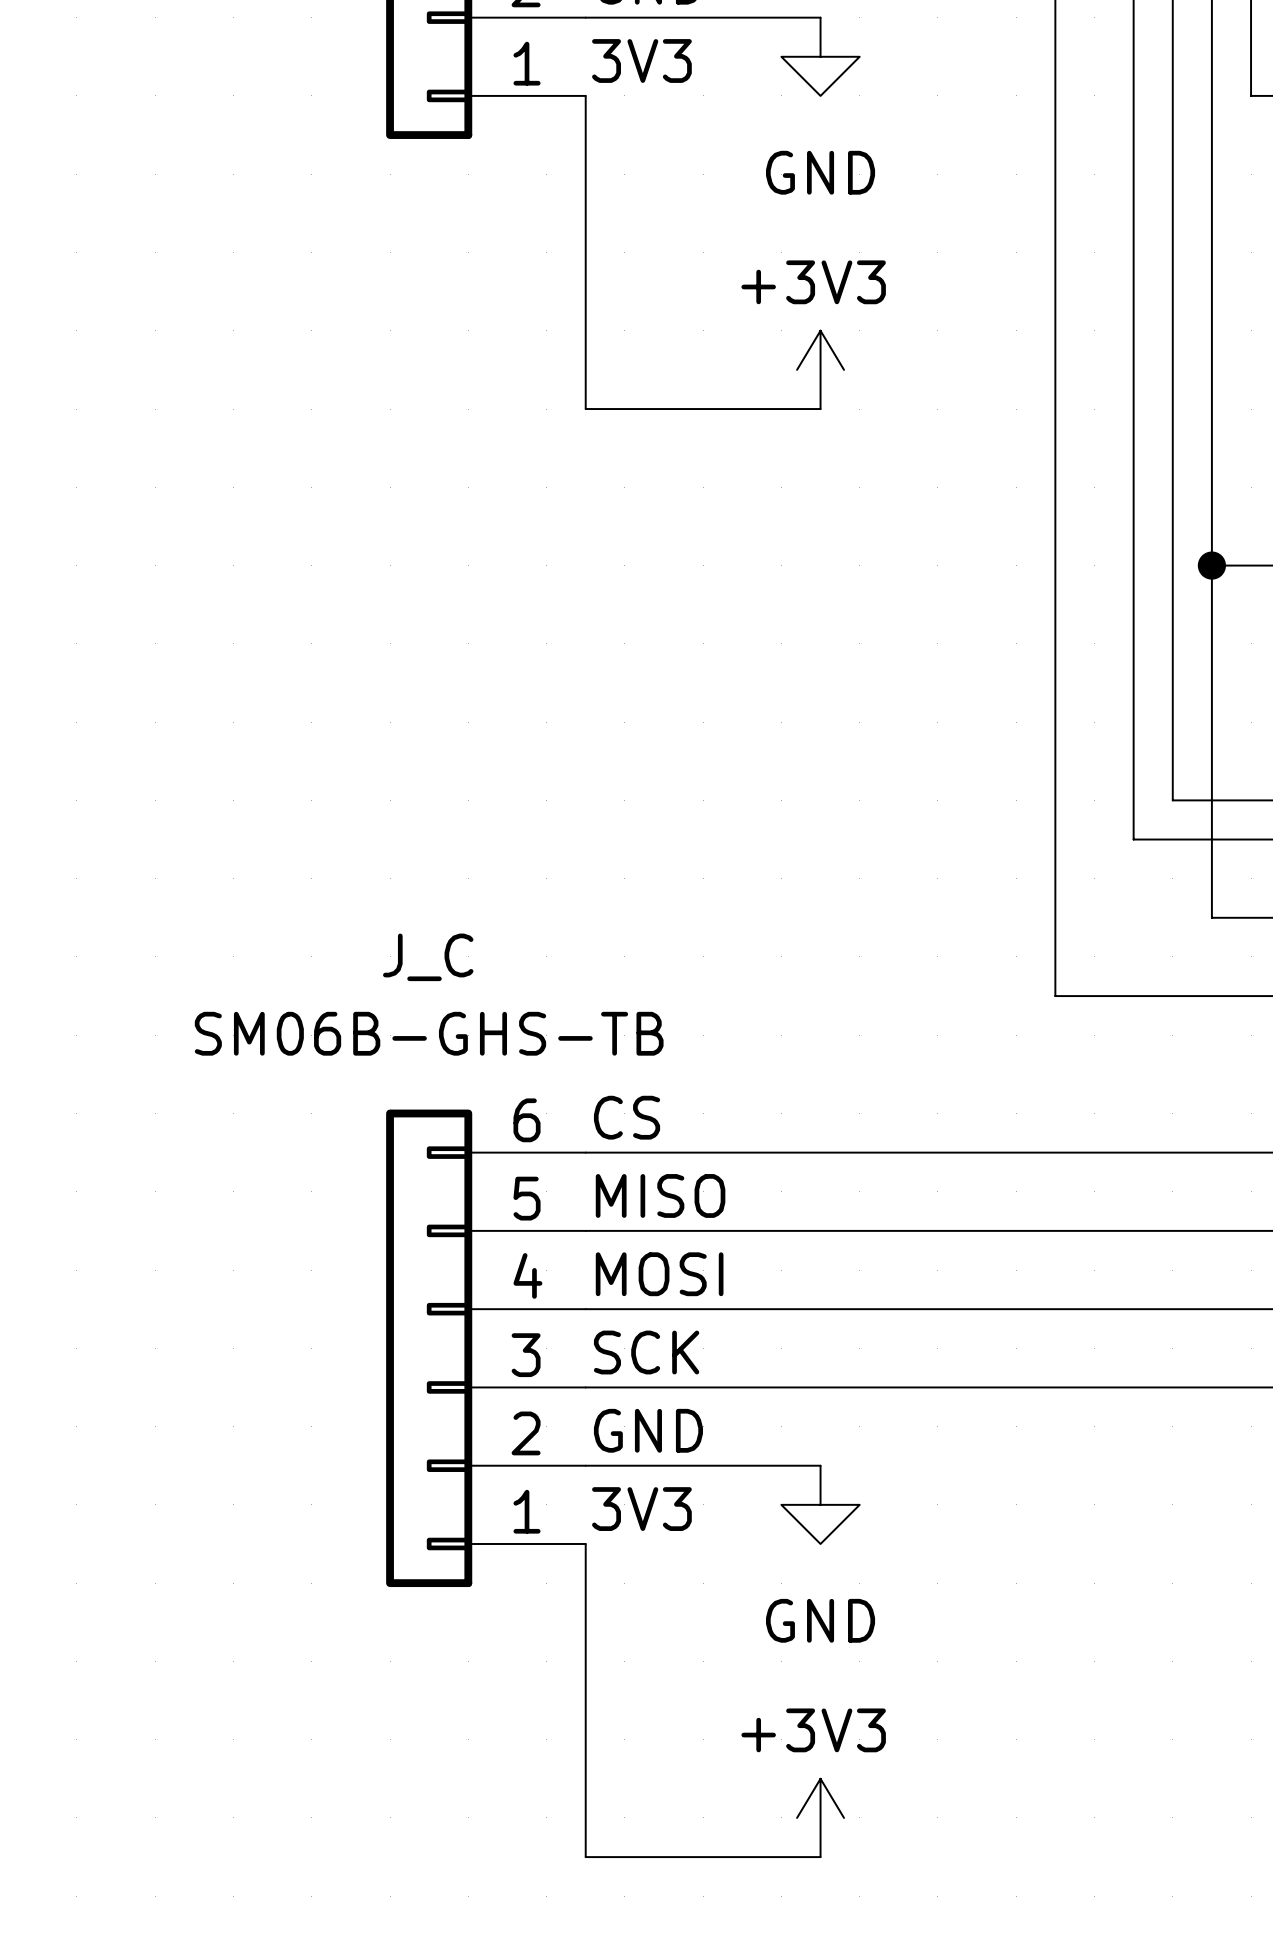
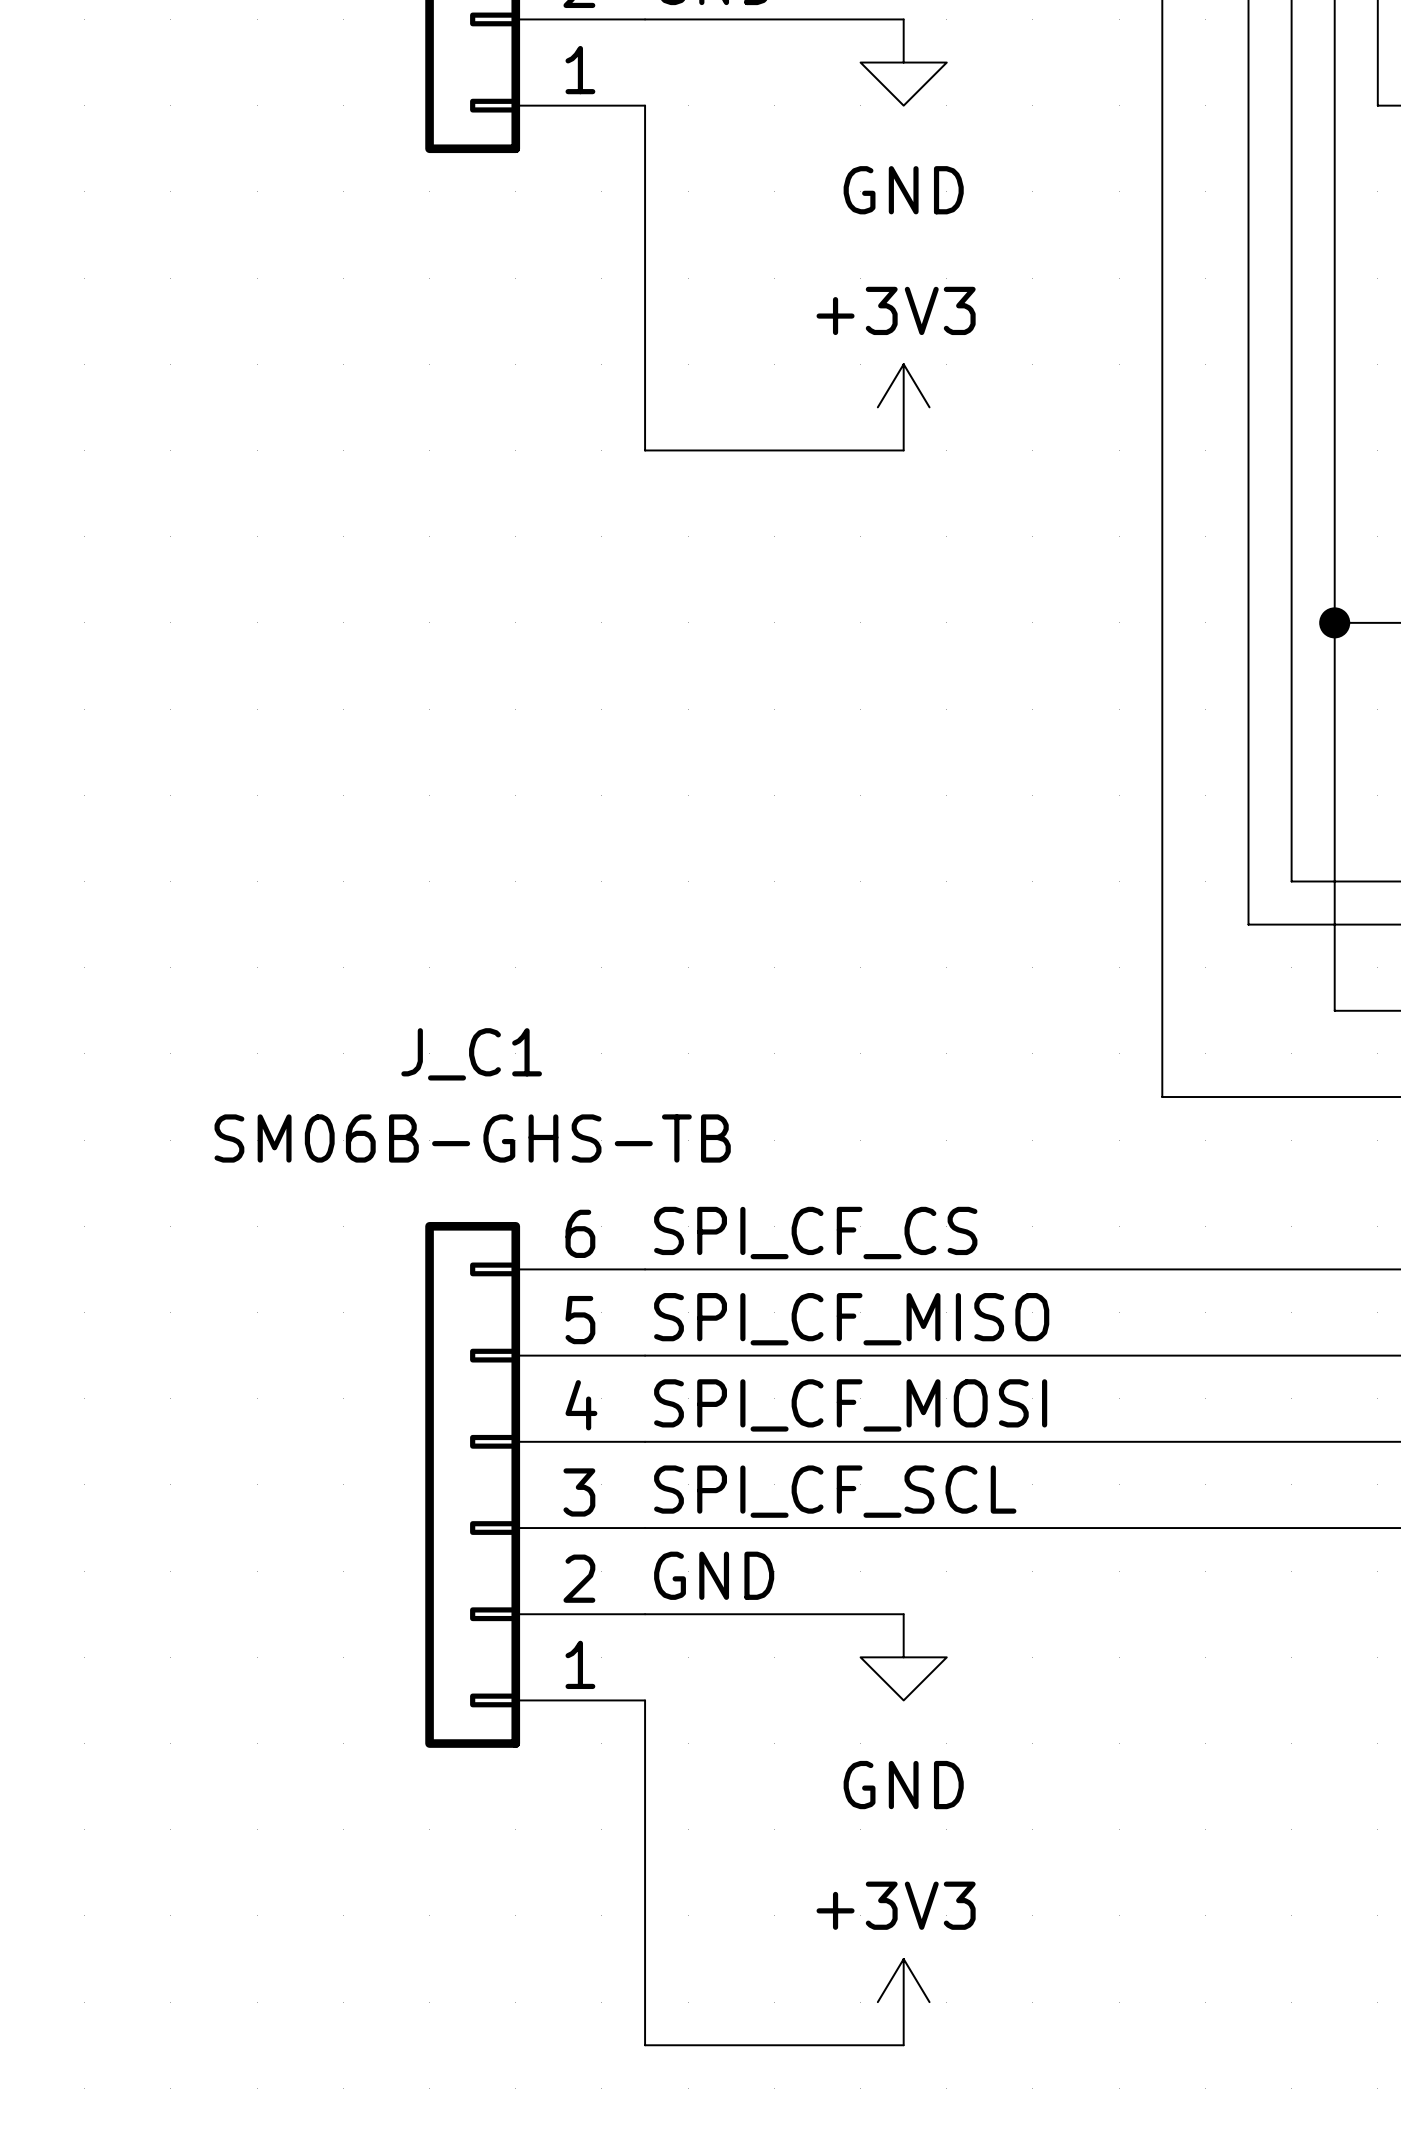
label: 3V3 (641, 61) -> none
J_C name: J_C (428, 957) -> J_C1 (471, 1054)
label: CS (627, 1117) -> SPI_CF_CS (815, 1233)
label: MISO (660, 1195) -> SPI_CF_MISO (851, 1319)
label: MOSI (659, 1274) -> SPI_CF_MOSI (850, 1405)
label: SCK (646, 1352) -> SPI_CF_SCL (835, 1491)
label: 3V3 (641, 1509) -> none

